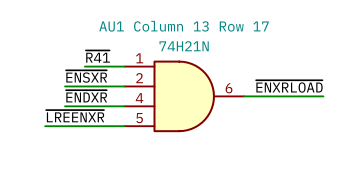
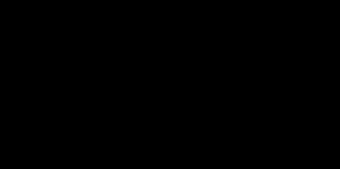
label: ~{R41} (97, 56) -> none
wire: (84, 66) (124, 66) -> none
label: ~{ENSXR} (86, 76) -> none
wire: (65, 86) (124, 86) -> none
label: ~{ENXRLOAD} (289, 86) -> none
label: ~{ENDXR} (86, 96) -> none
part: 74H21N (184, 96) -> none
wire: (243, 96) (323, 96) -> none
wire: (65, 106) (124, 106) -> none
label: ~{LREENXR} (75, 116) -> none
wire: (45, 126) (124, 126) -> none

